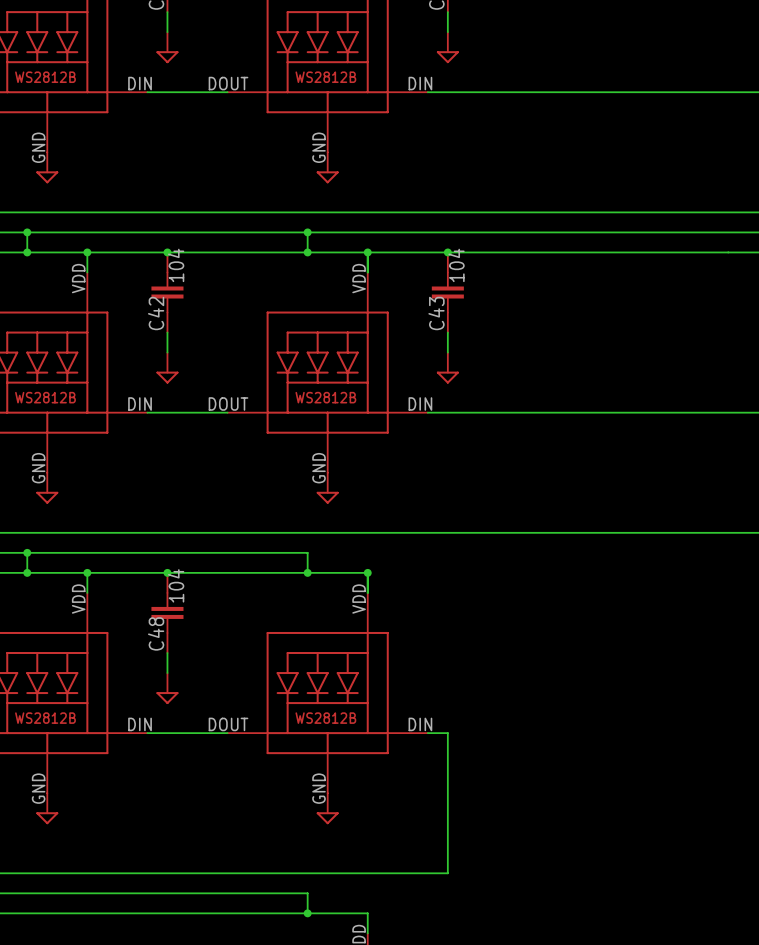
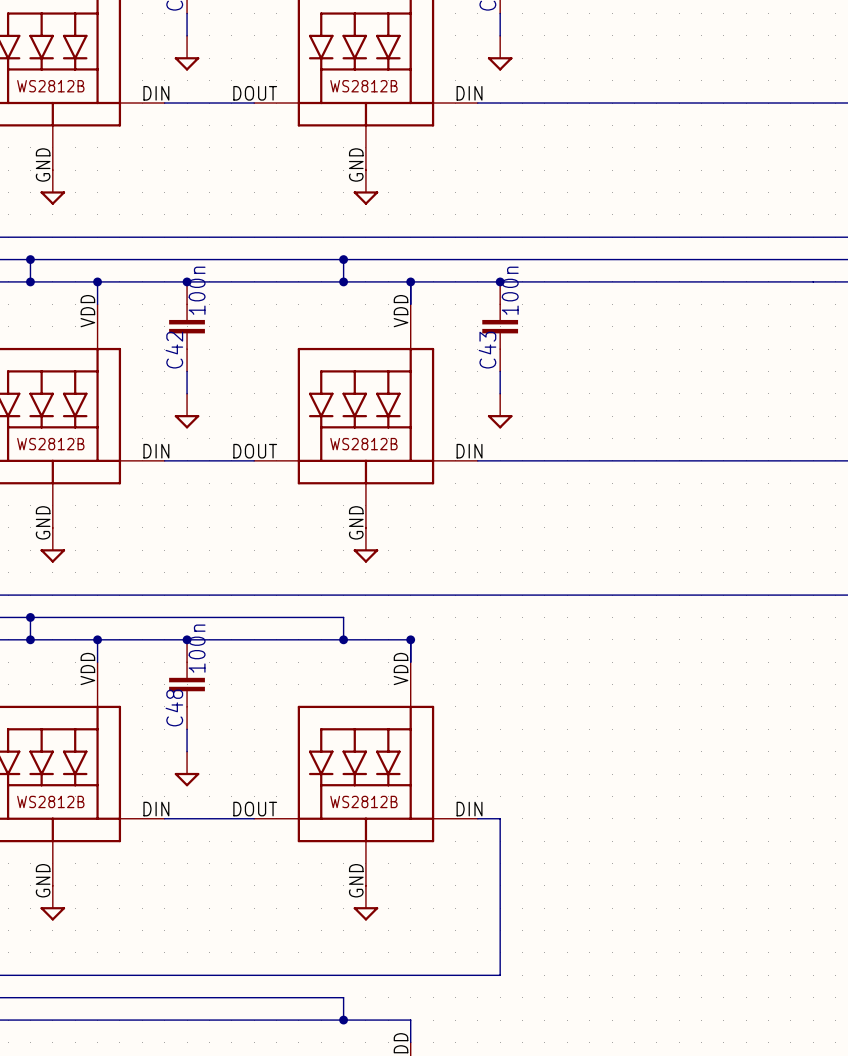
C42 value: 104 (176, 265) -> 100n (197, 290)
C43 value: 104 (456, 265) -> 100n (510, 290)
C48 value: 104 (176, 585) -> 100n (197, 648)

